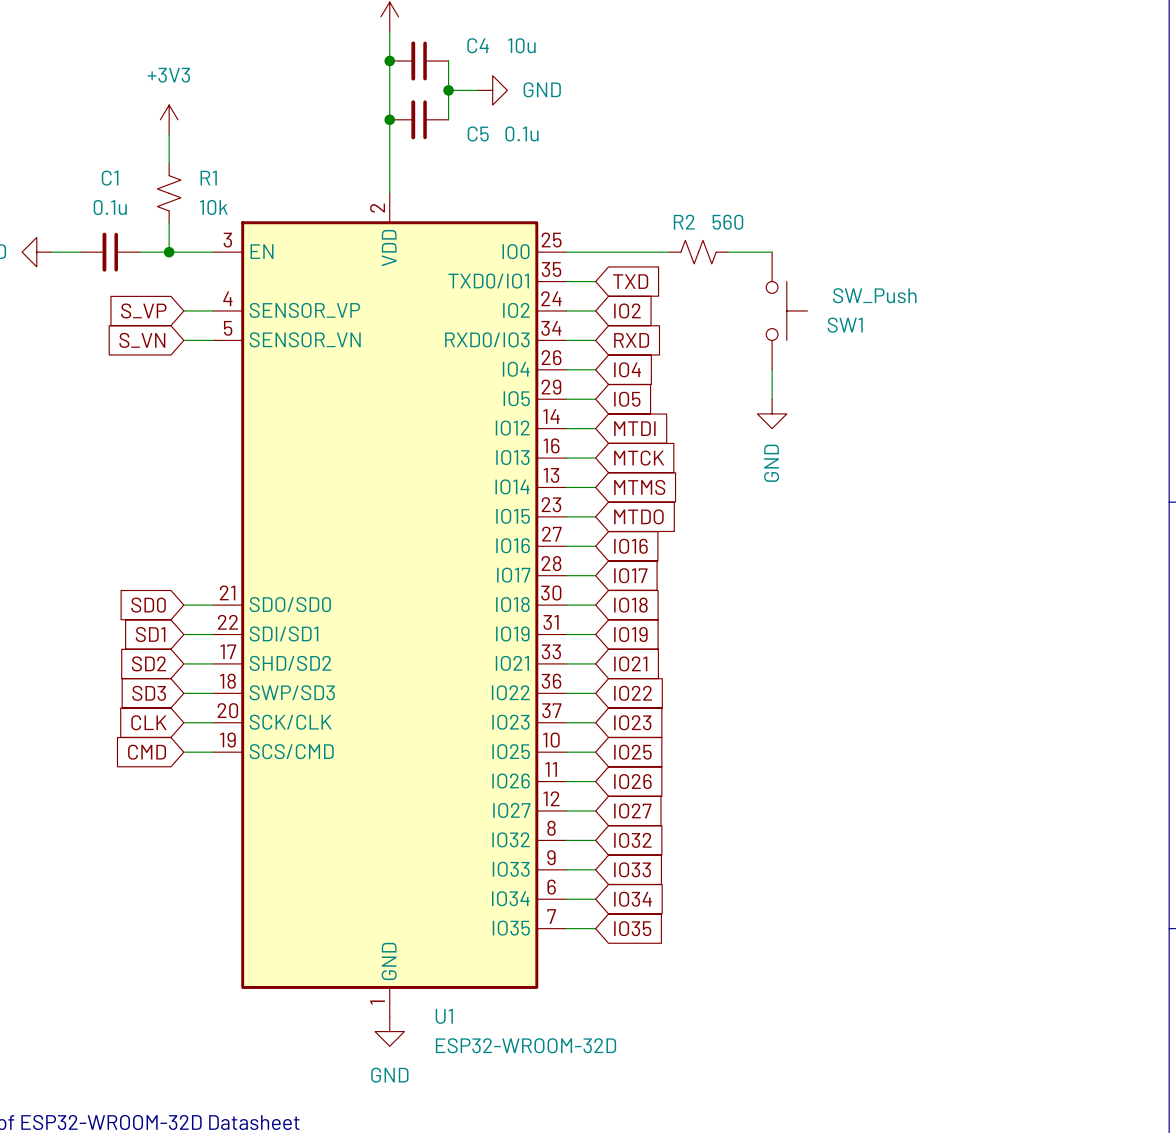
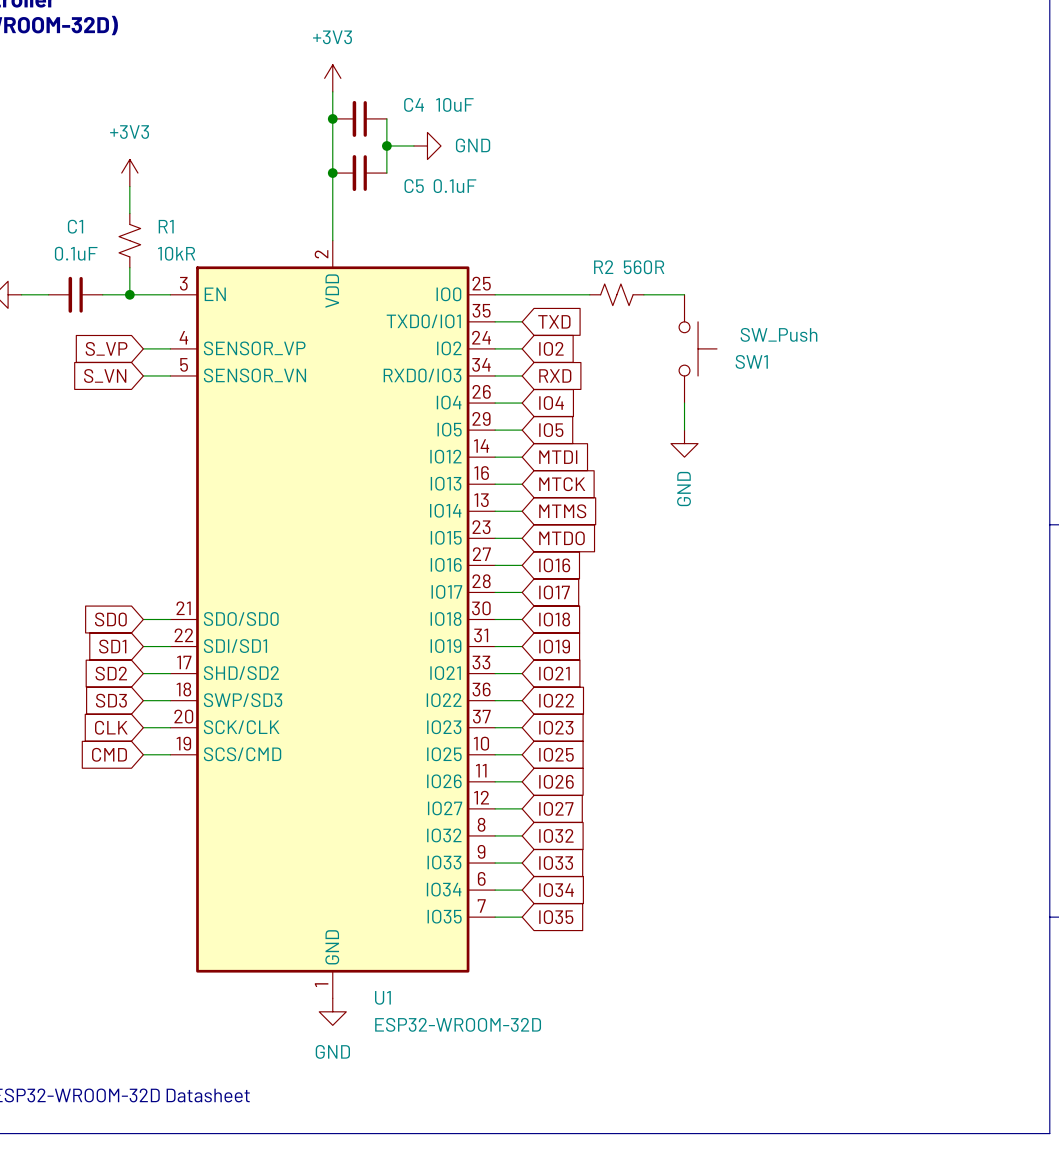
C4 value: 10u (521, 45) -> 10uF (454, 104)
C5 value: 0.1u (522, 133) -> 0.1uF (455, 186)
C1 value: 0.1u (110, 207) -> 0.1uF (76, 253)
R1 value: 10k (213, 207) -> 10kR (176, 253)
R2 value: 560 (727, 222) -> 560R (644, 267)

